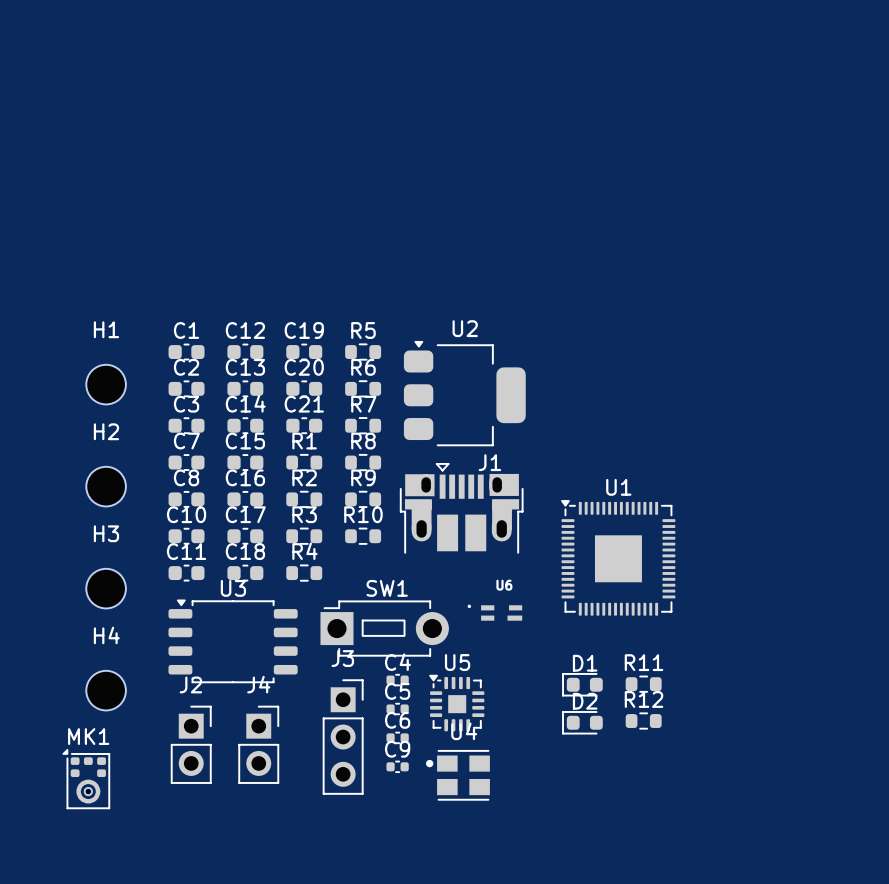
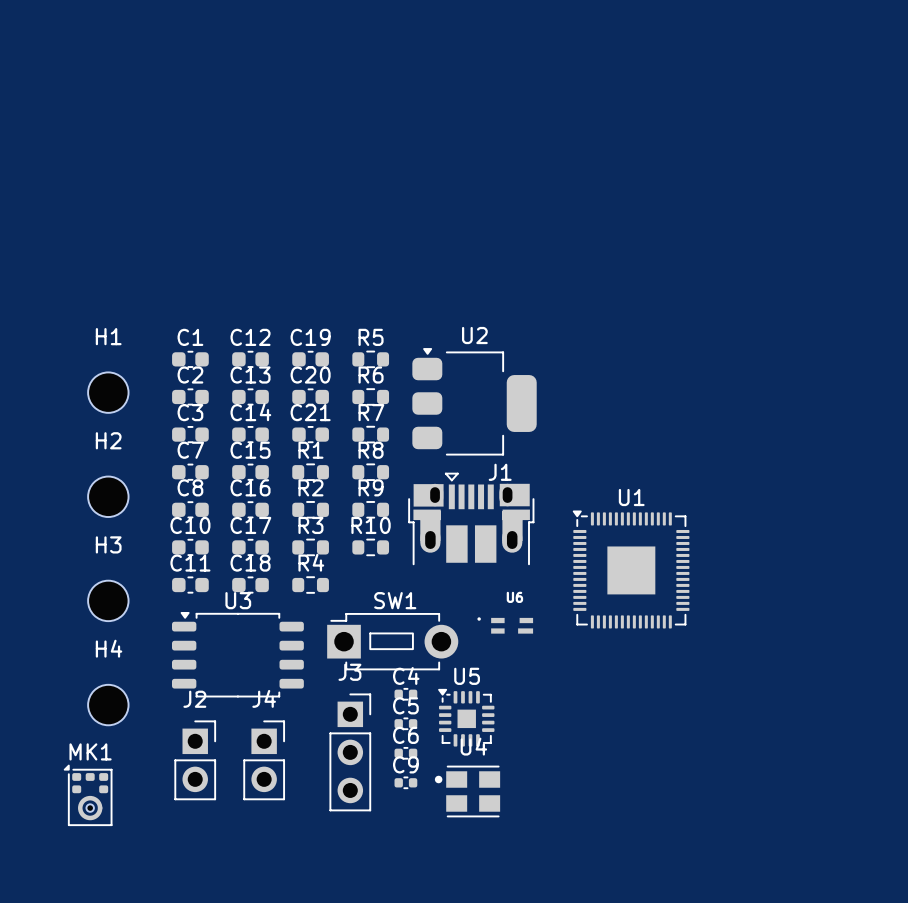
D1: (582, 684) -> none
R11: (643, 684) -> none
R12: (643, 721) -> none
D2: (582, 722) -> none

